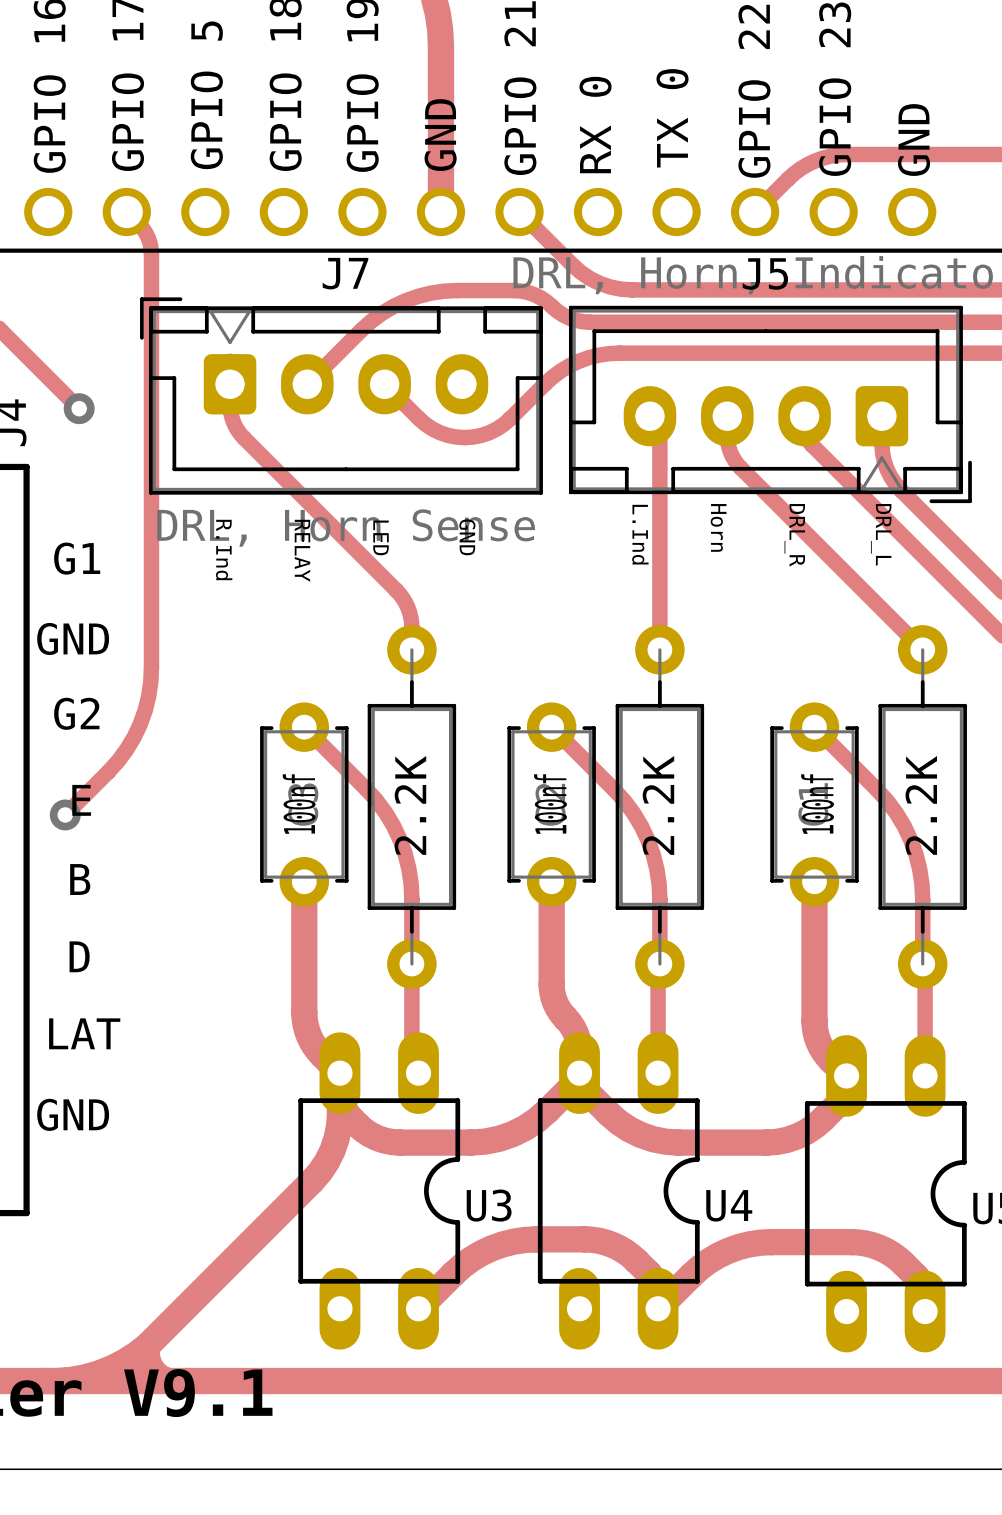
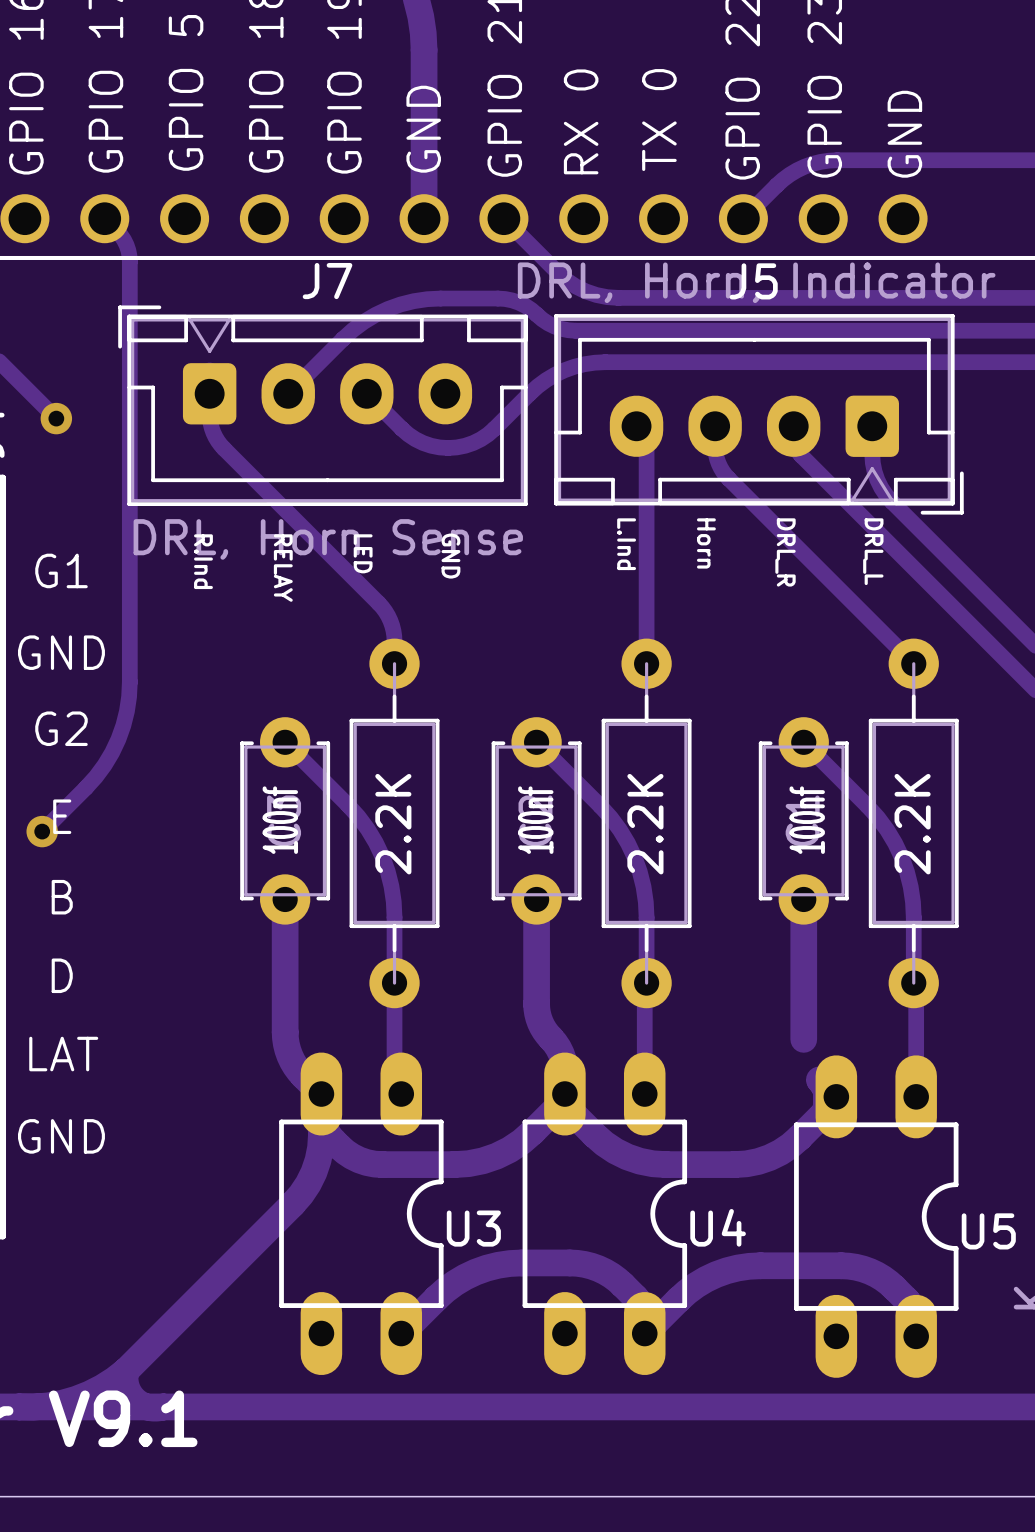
track: (814, 1019) (815, 1031) (820, 1047) (844, 1076) (846, 1085) (843, 1097) (815, 1126) (797, 1136) (776, 1141) (746, 1142) -> (819, 1079) (826, 1091) (825, 1110) (799, 1137) (780, 1152) (769, 1157) (746, 1163) (734, 1164)

